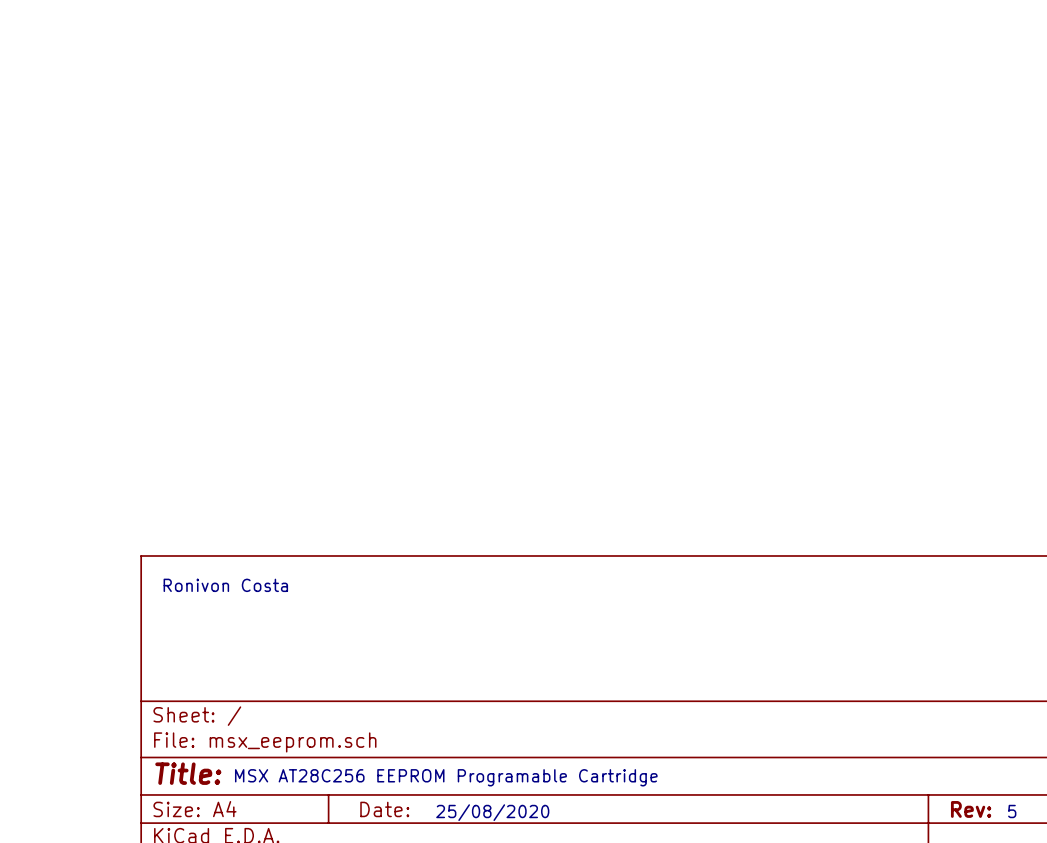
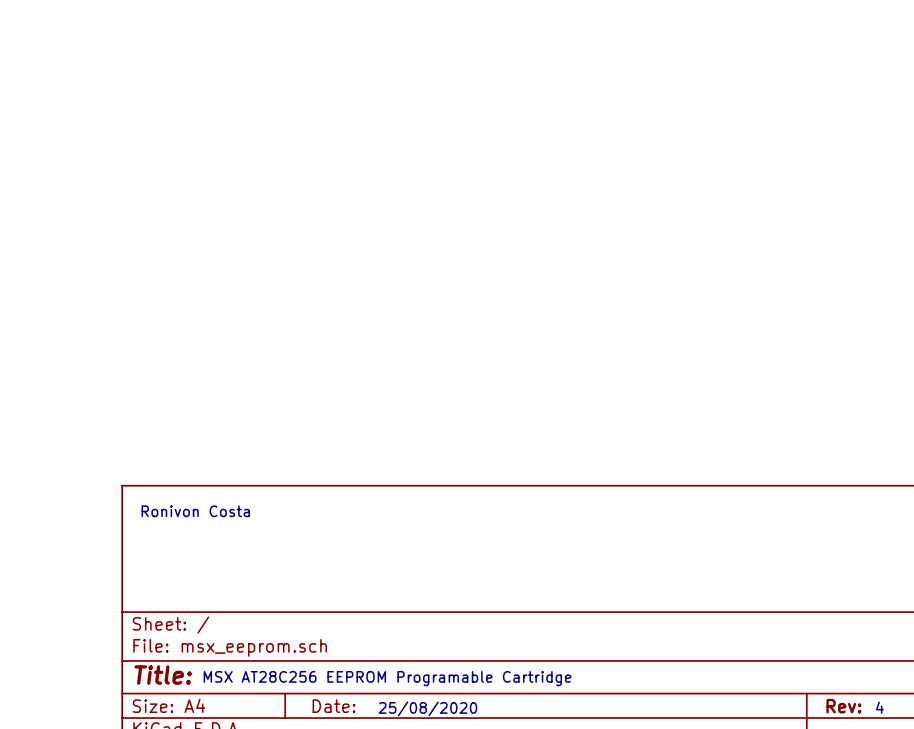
text: 5 (1012, 811) -> 4 (879, 707)

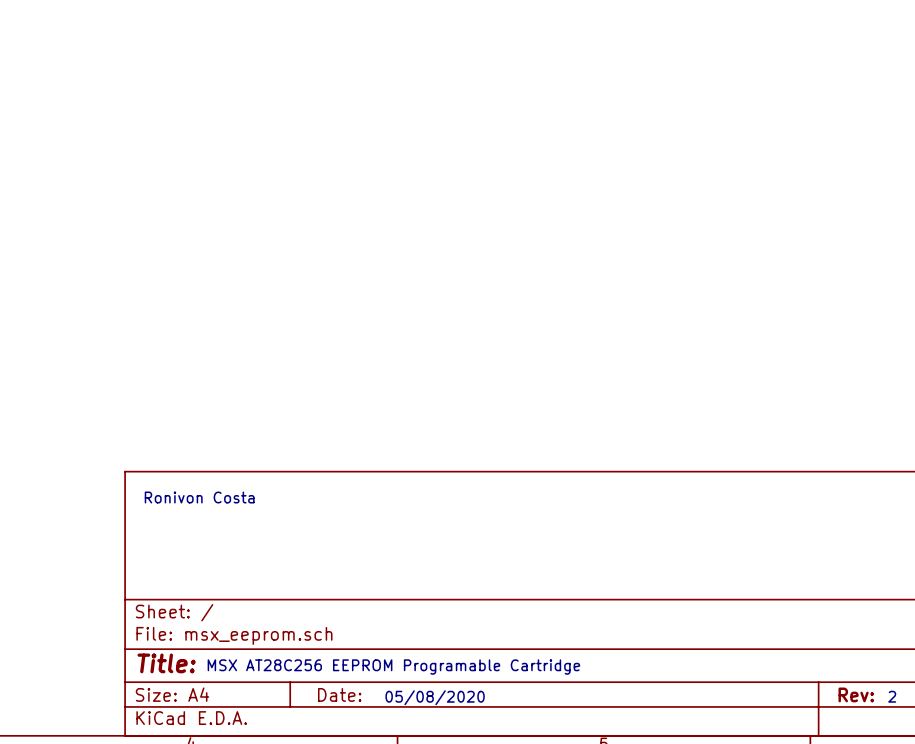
text: 4 (879, 707) -> 2 (892, 696)
text: 25/08/2020 (427, 708) -> 05/08/2020 (435, 697)

